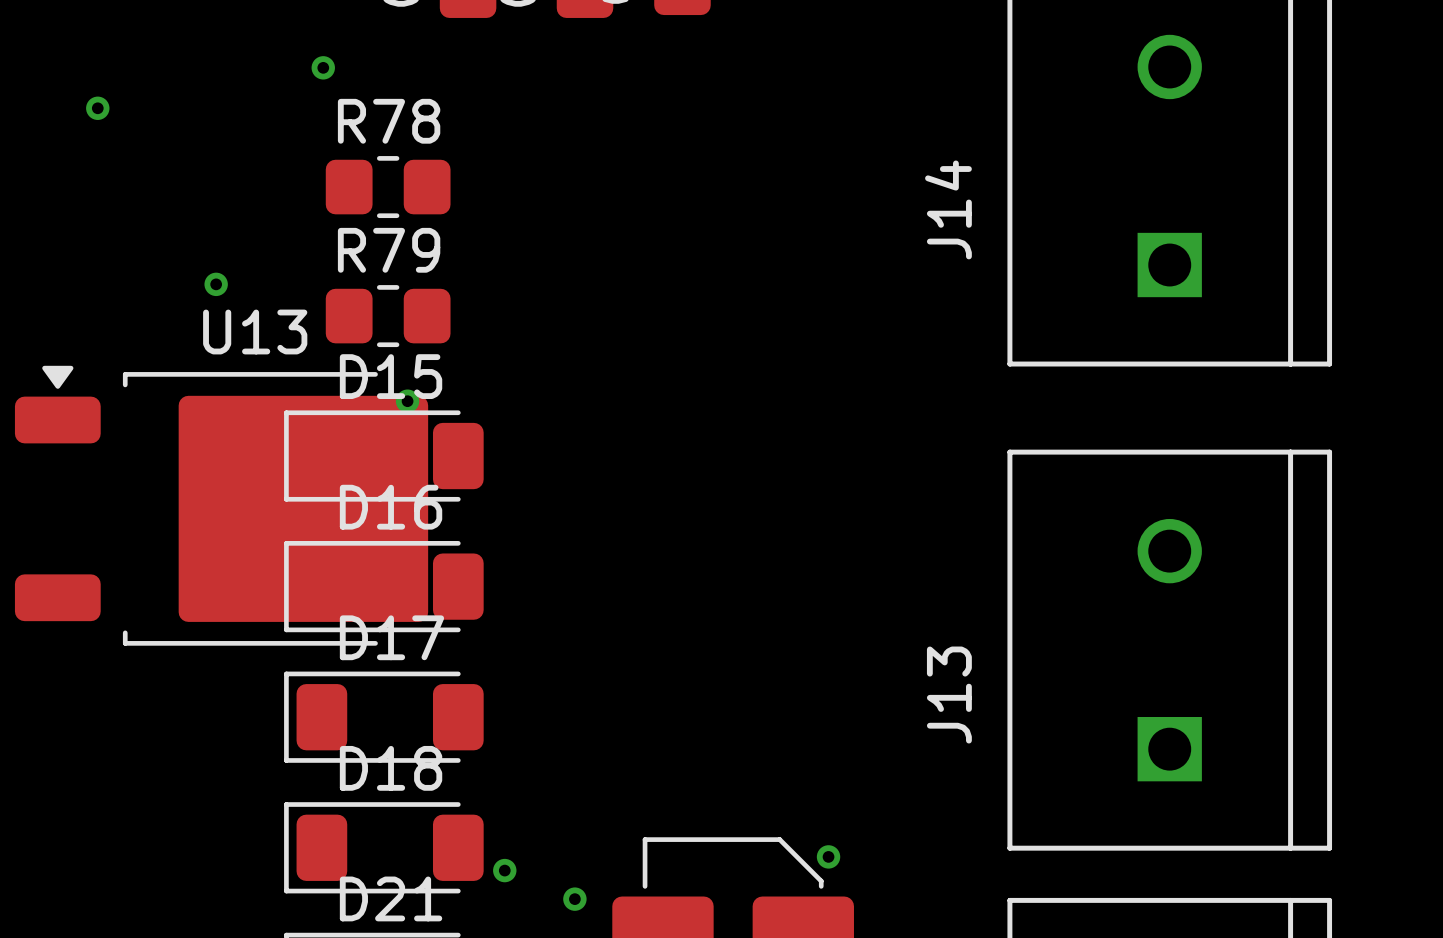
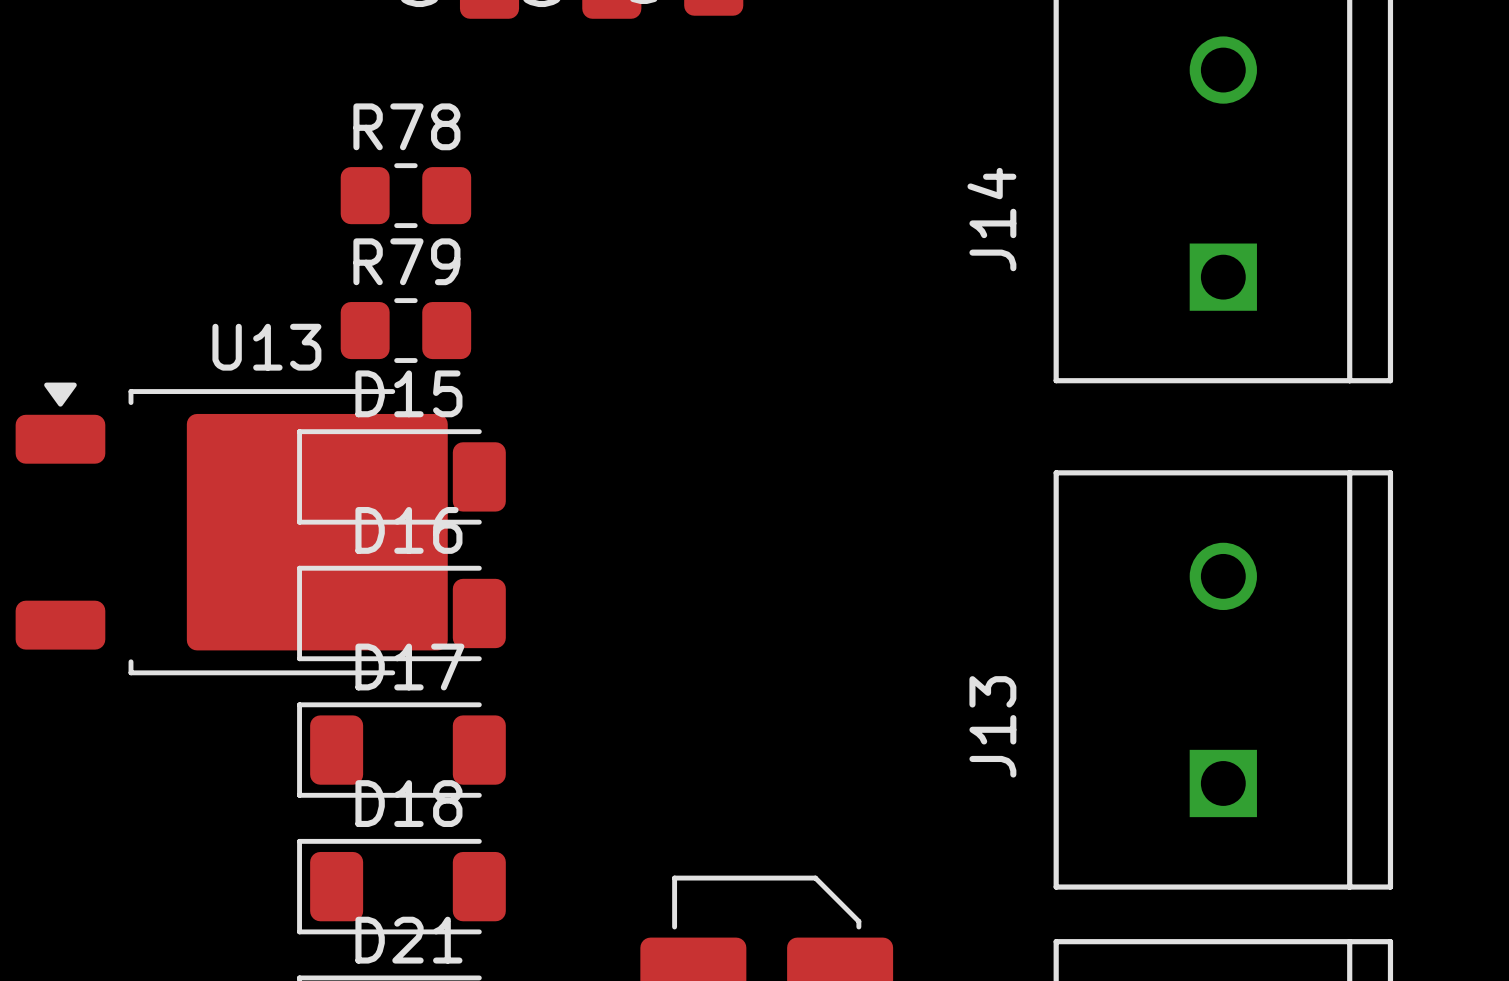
via: (323, 67) -> none
via: (97, 108) -> none
via: (216, 284) -> none
via: (407, 401) -> none
via: (828, 856) -> none
via: (504, 870) -> none
via: (574, 899) -> none

